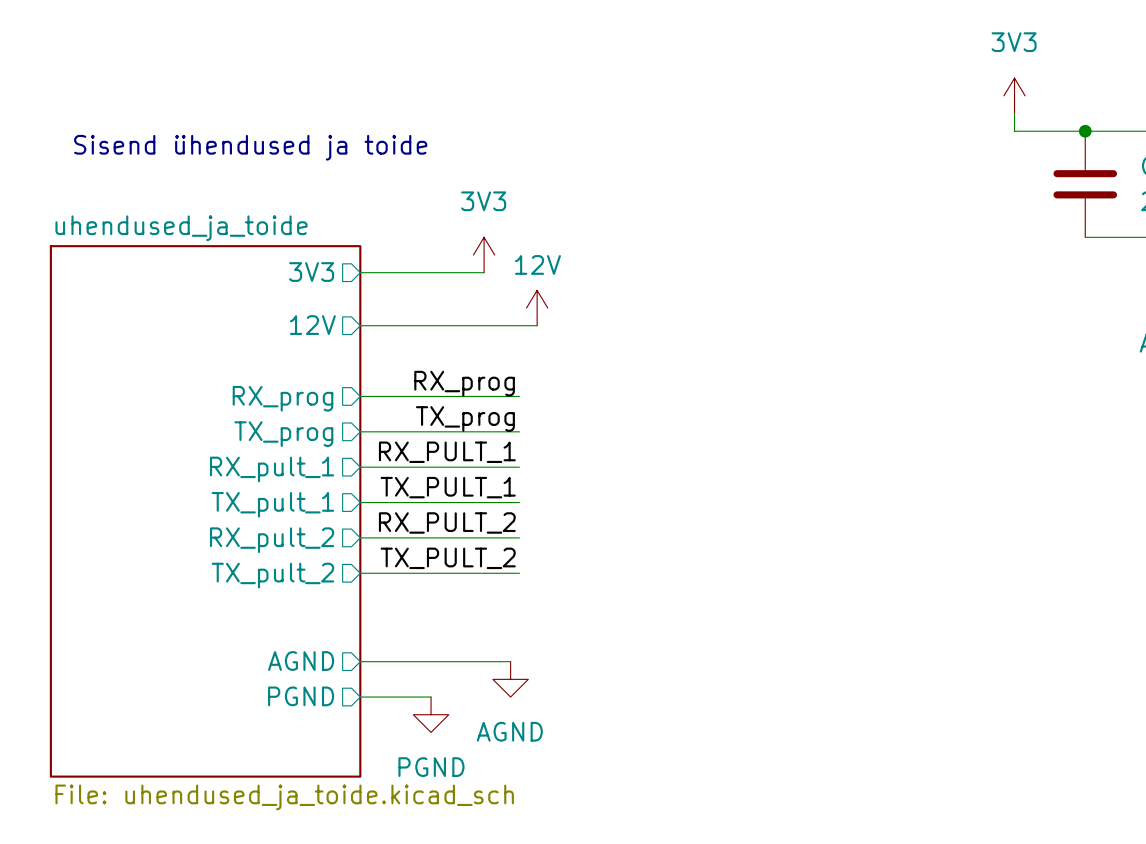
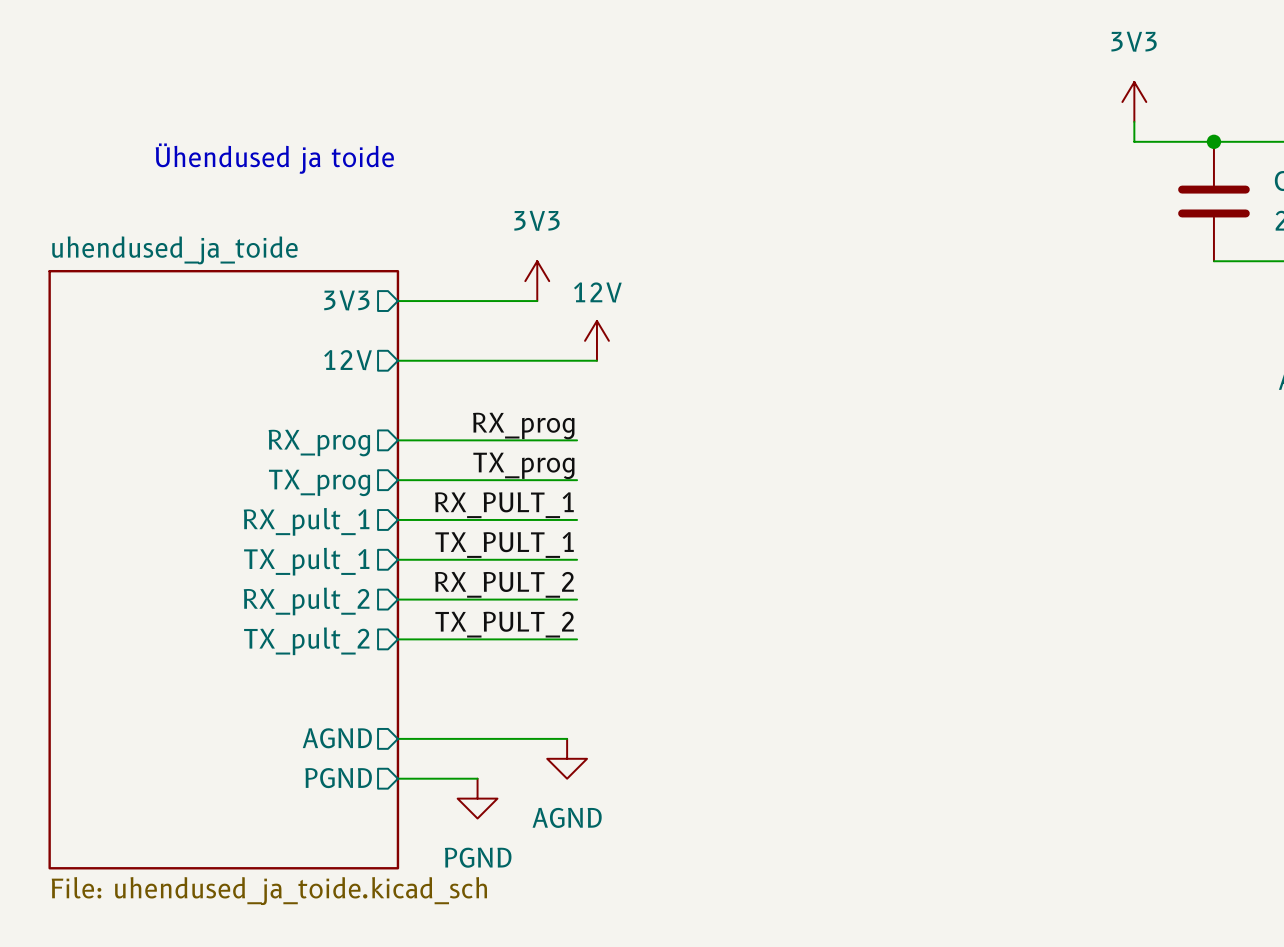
text: Sisend ühendused ja toide (250, 147) -> Ühendused ja toide (274, 158)

